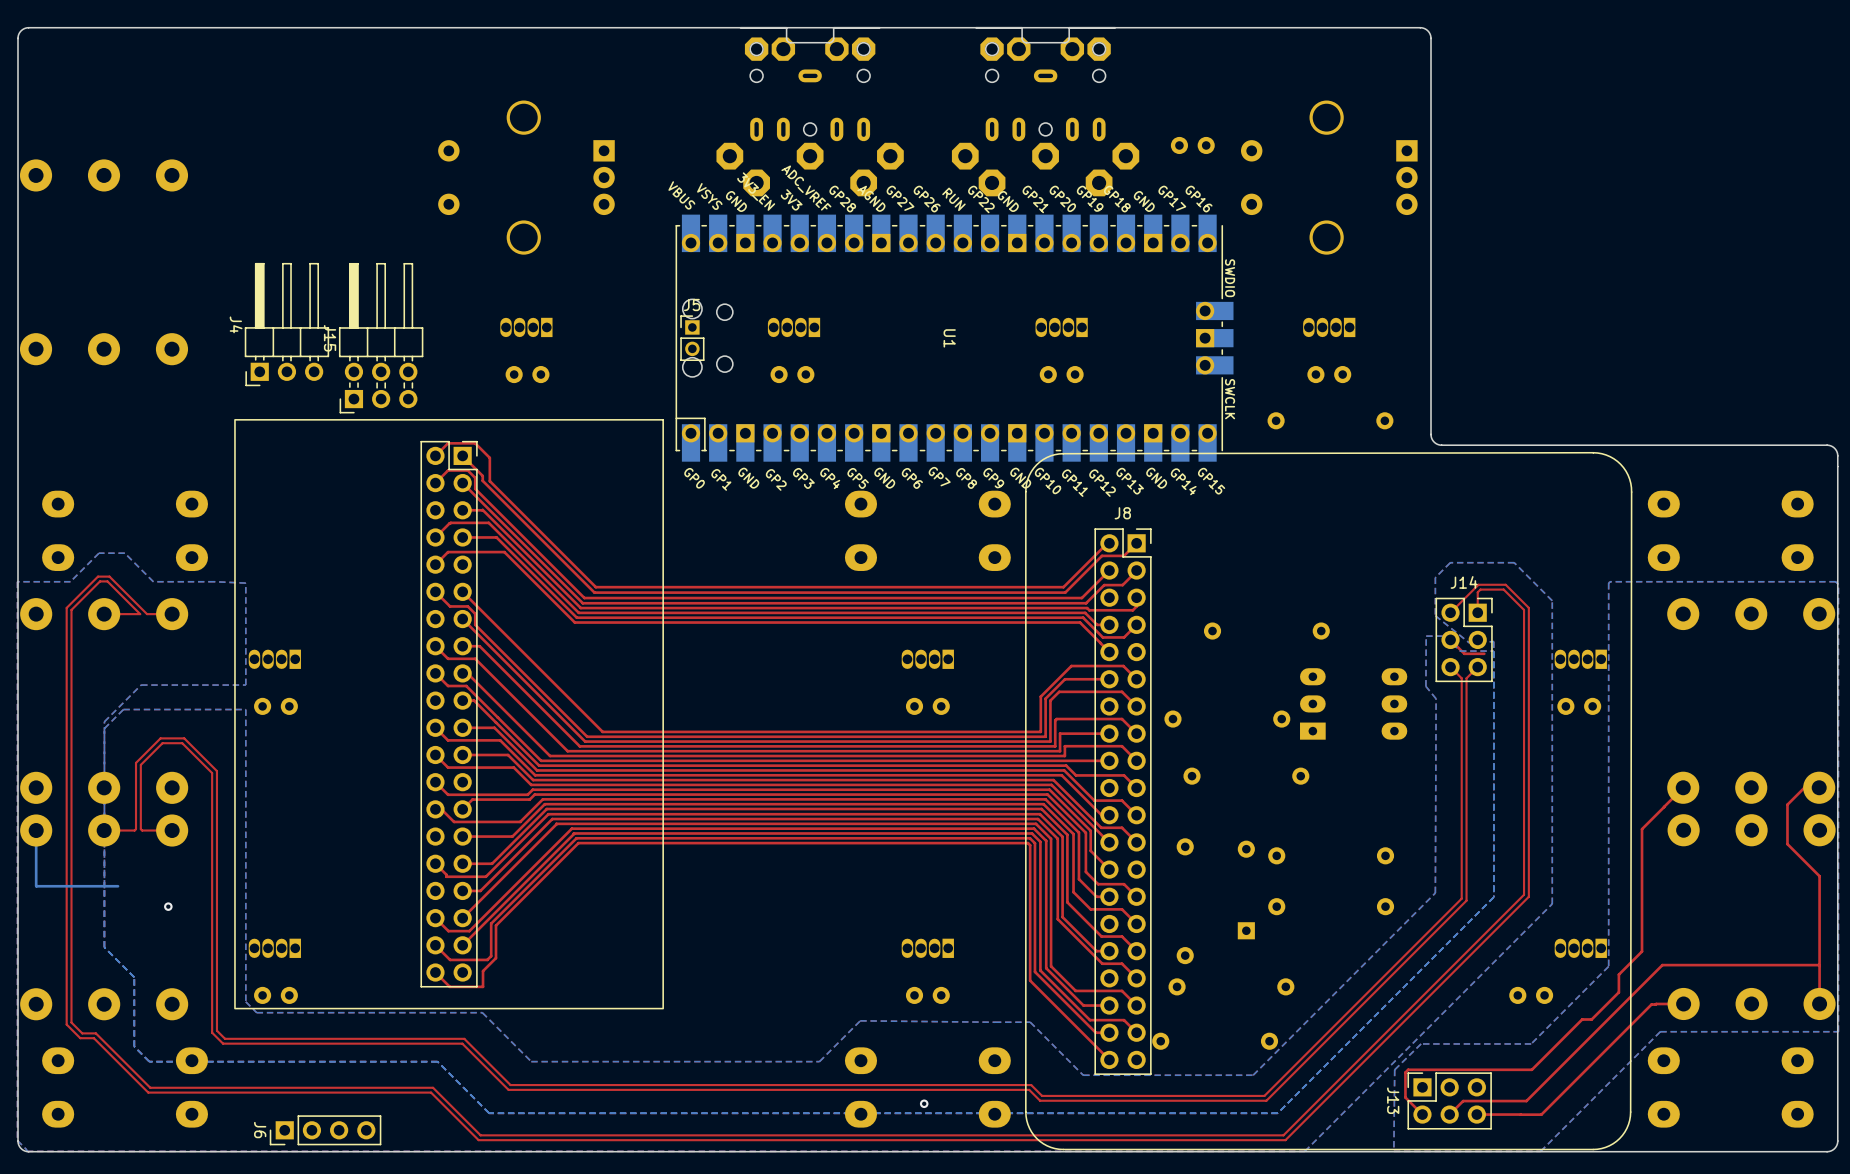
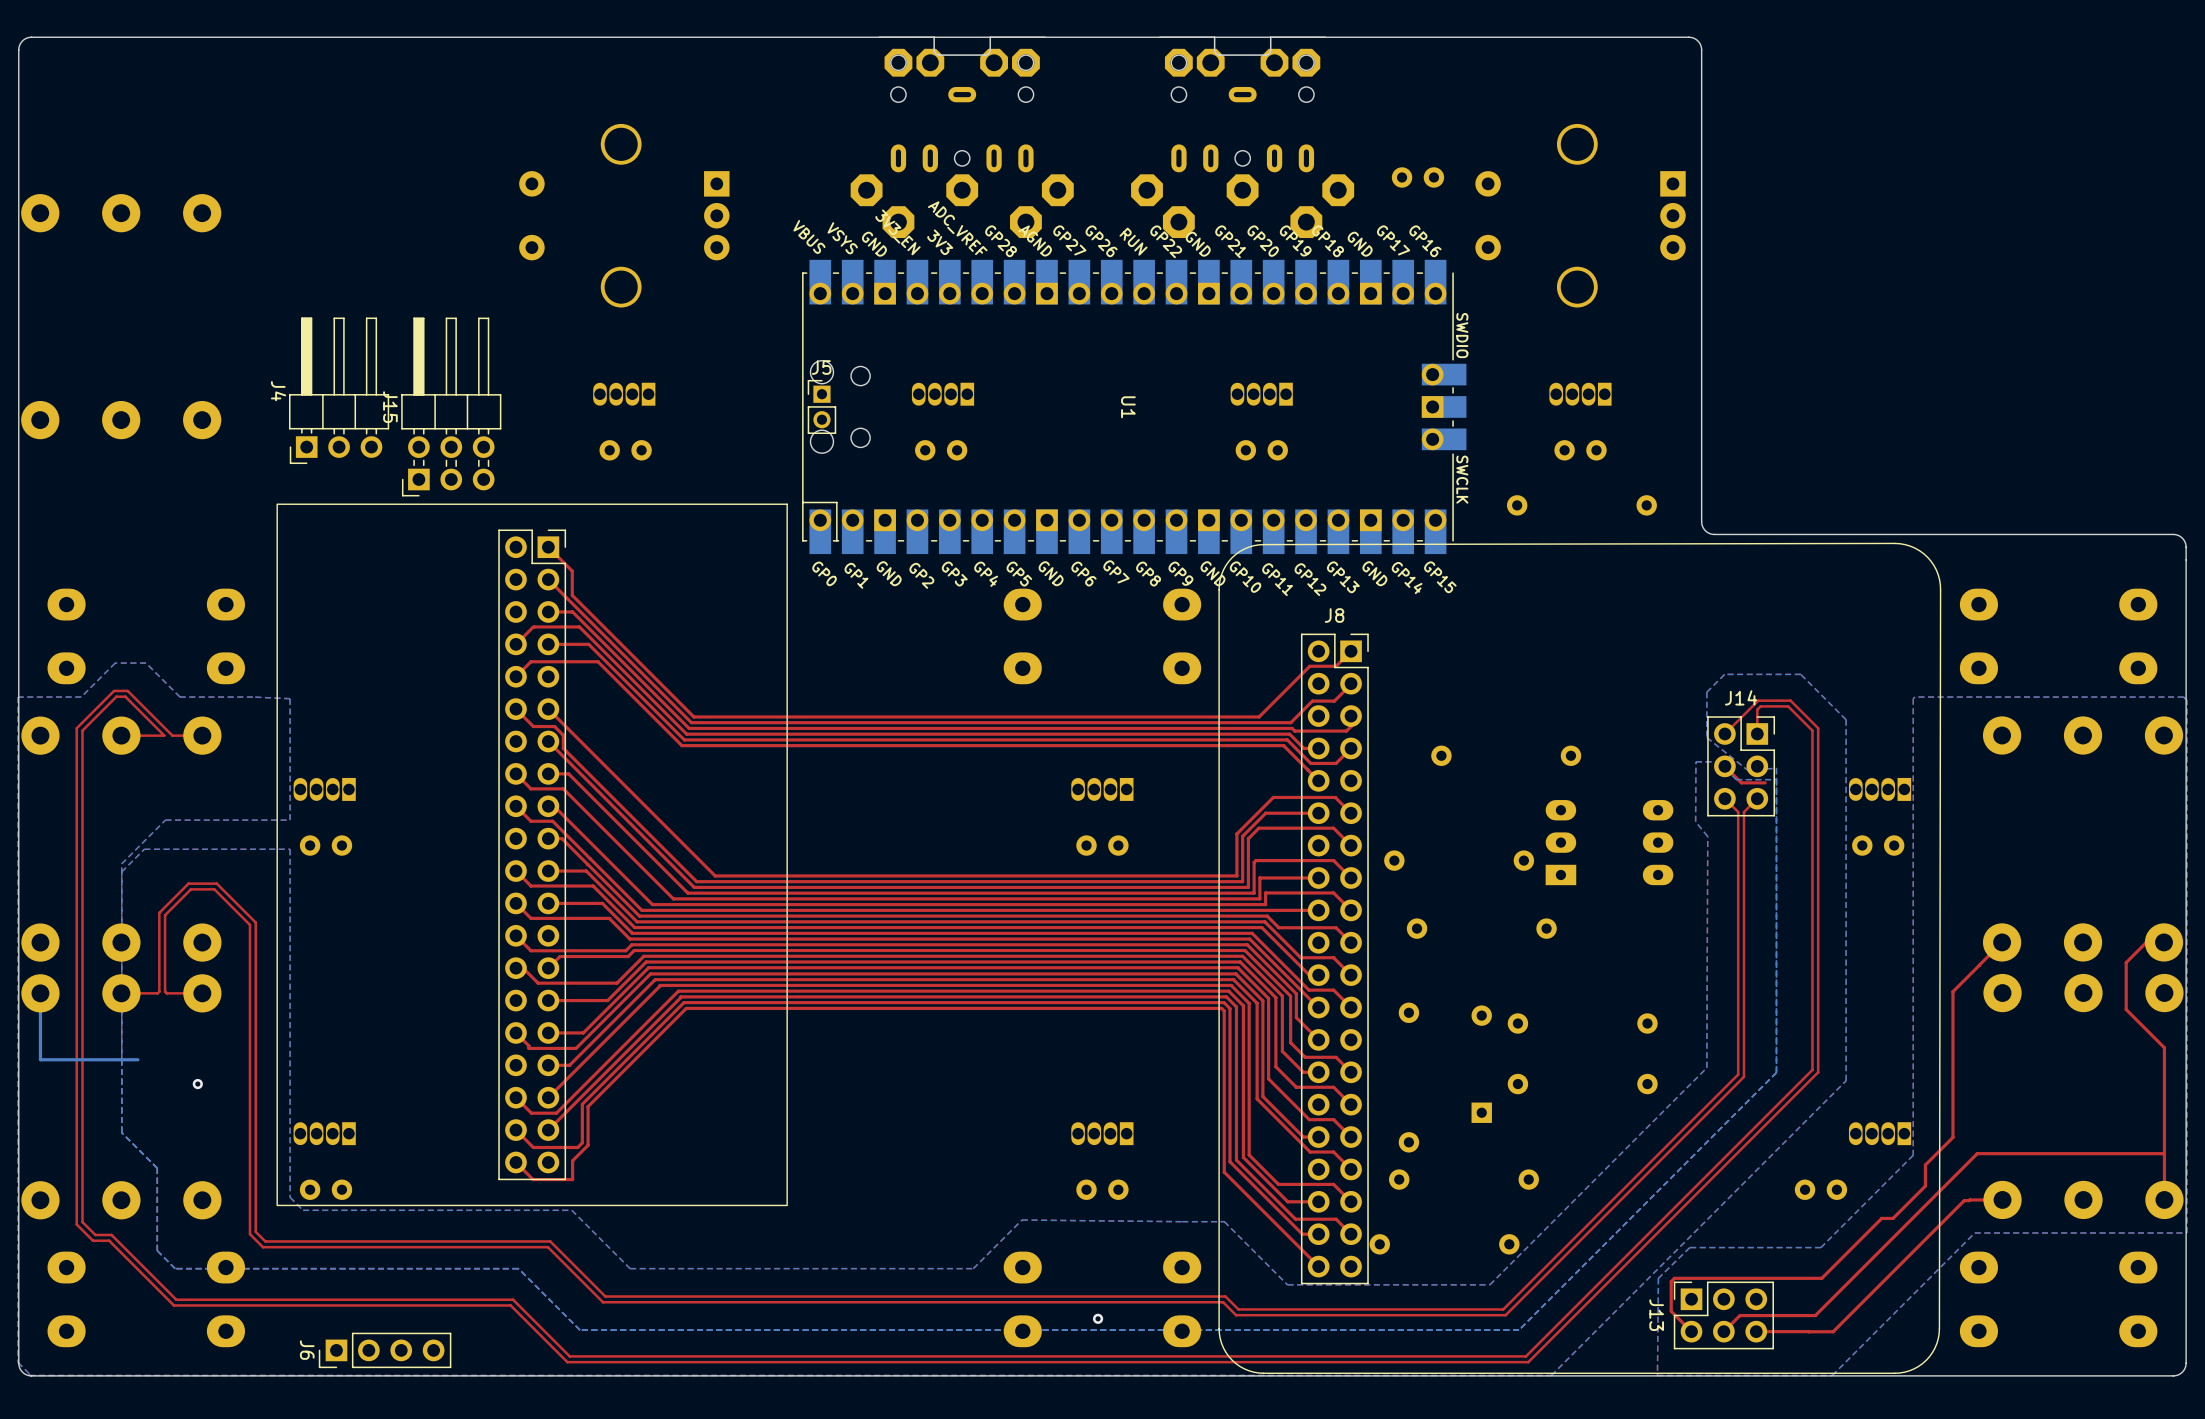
top track: (435, 455) (448, 443) (475, 443) (489, 457) (489, 481) (595, 587) (1063, 587) (1109, 543) -> none
top track: (482, 480) (594, 592) (1065, 592) -> none
top track: (435, 483) (448, 470) (467, 470) (475, 477) (475, 488) (482, 496) -> (572, 576) (572, 595)
top track: (1109, 570) (1081, 598) (584, 598) -> (1266, 710) (1259, 716) (693, 716)

